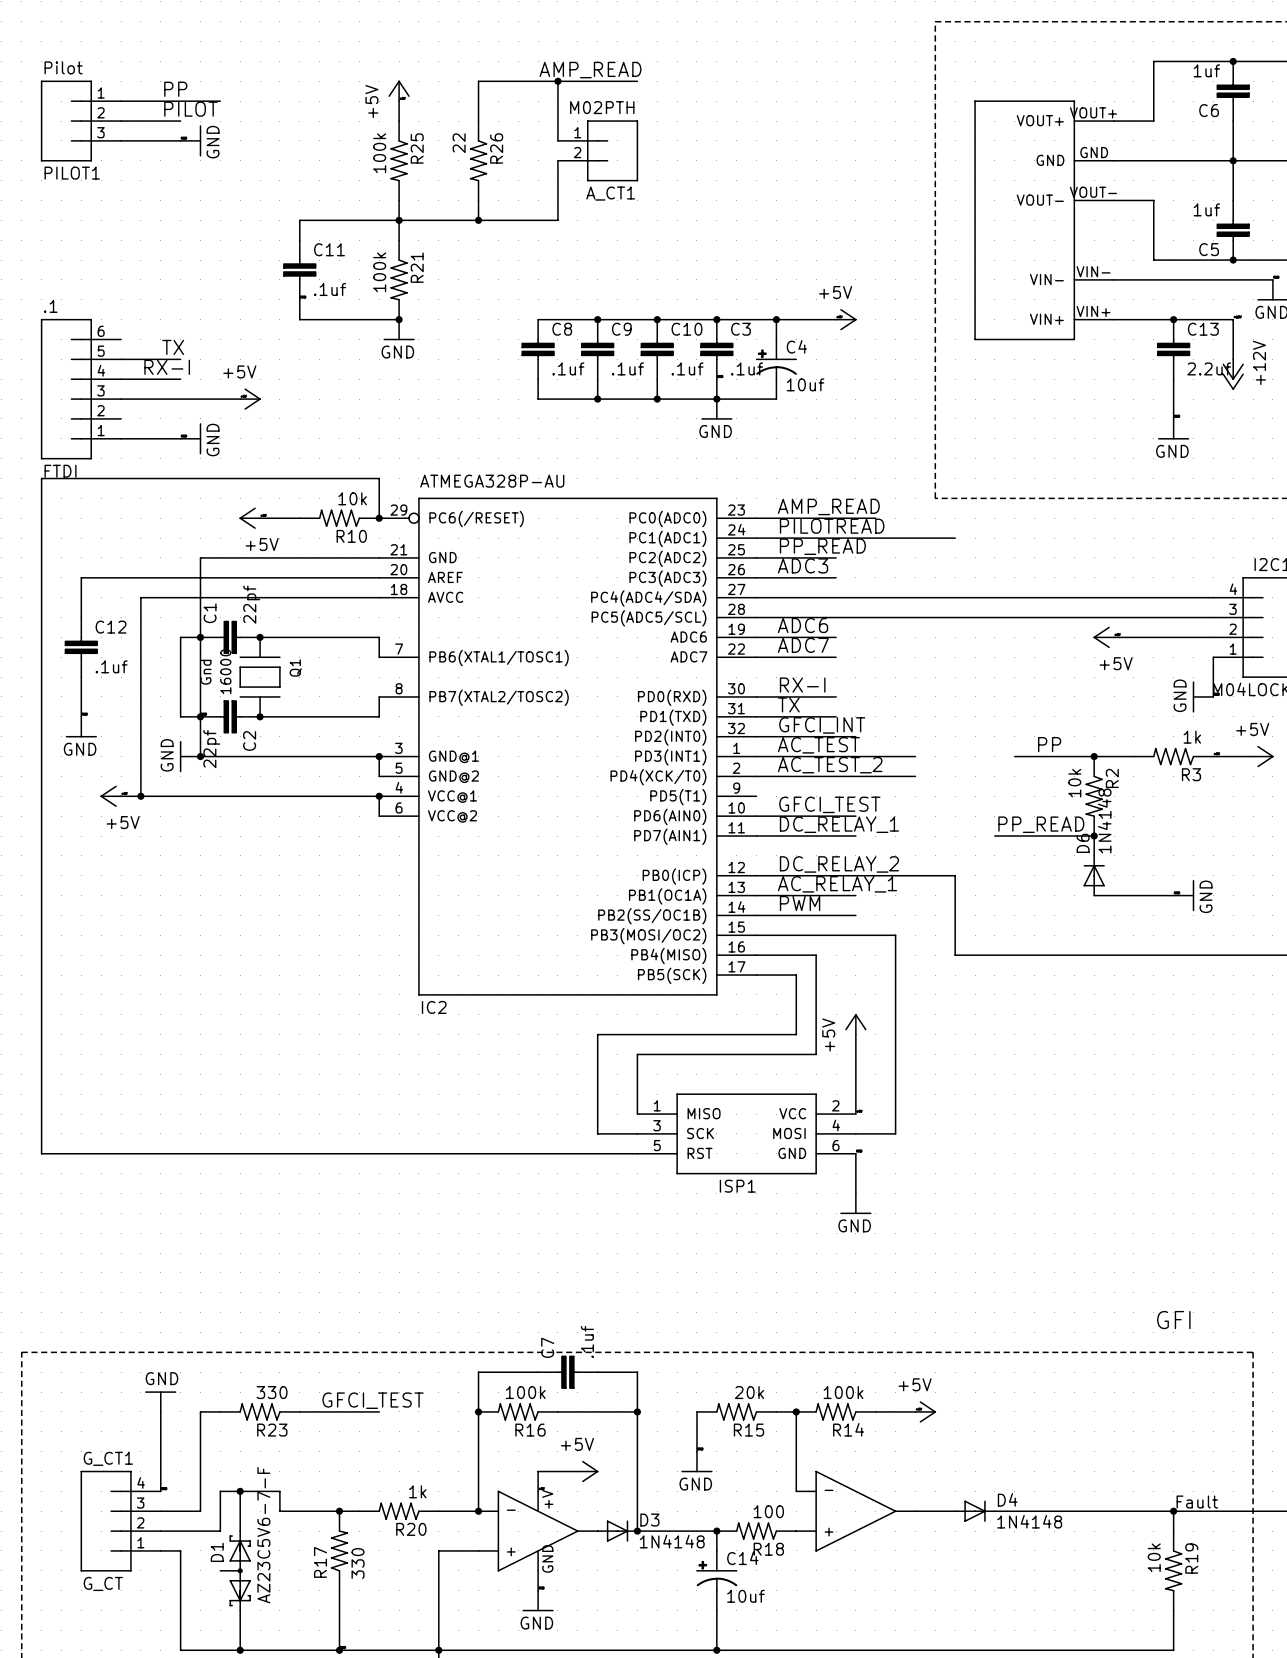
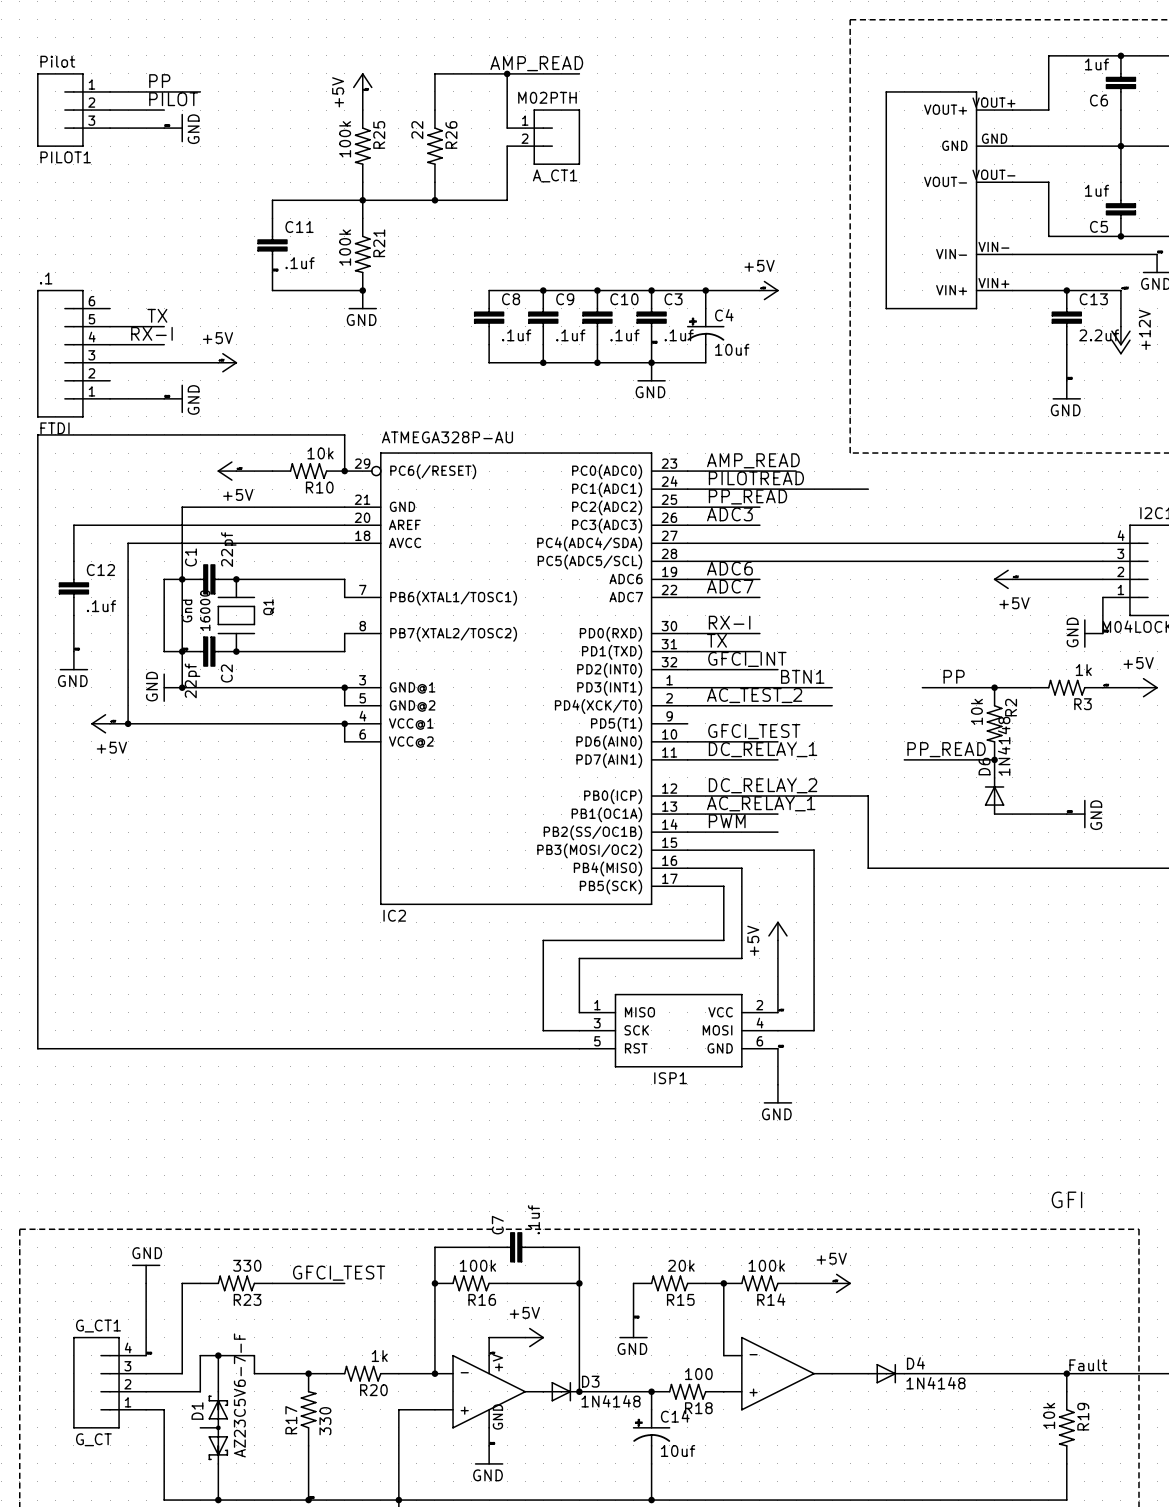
label: none -> BTN1 (802, 676)
label: AC_TEST (818, 745) -> none

